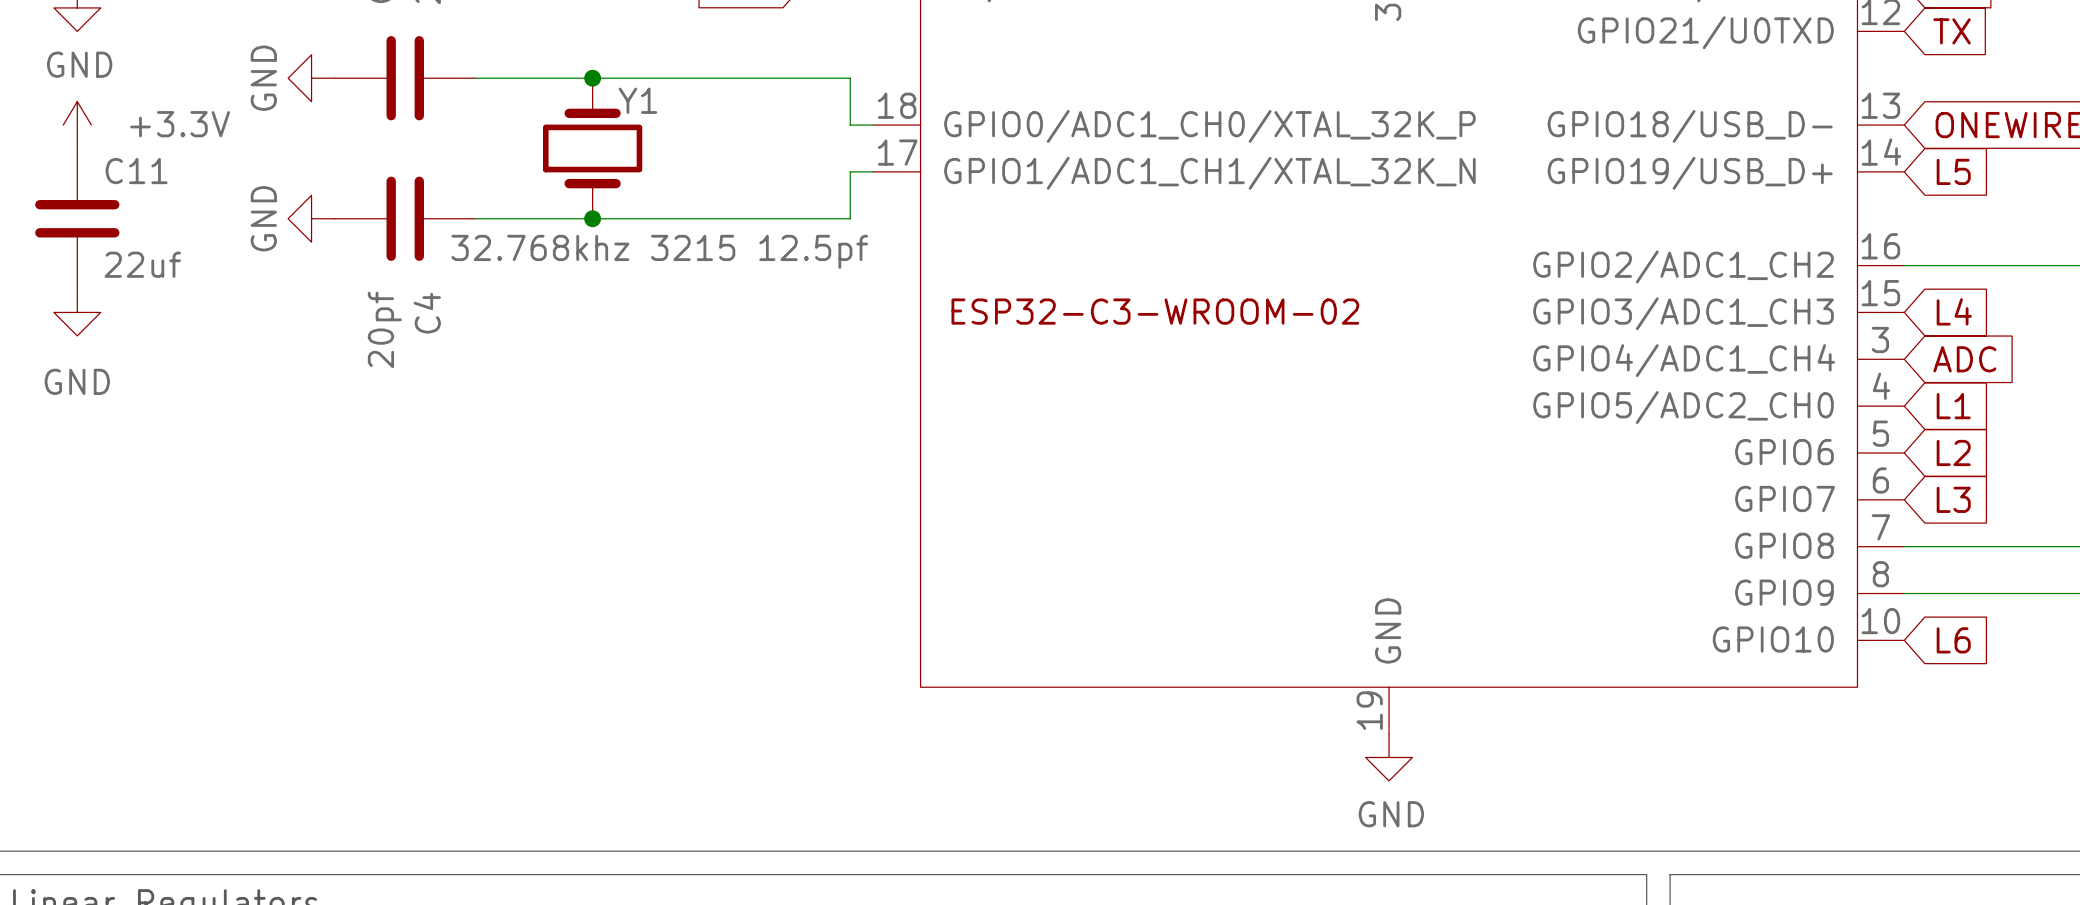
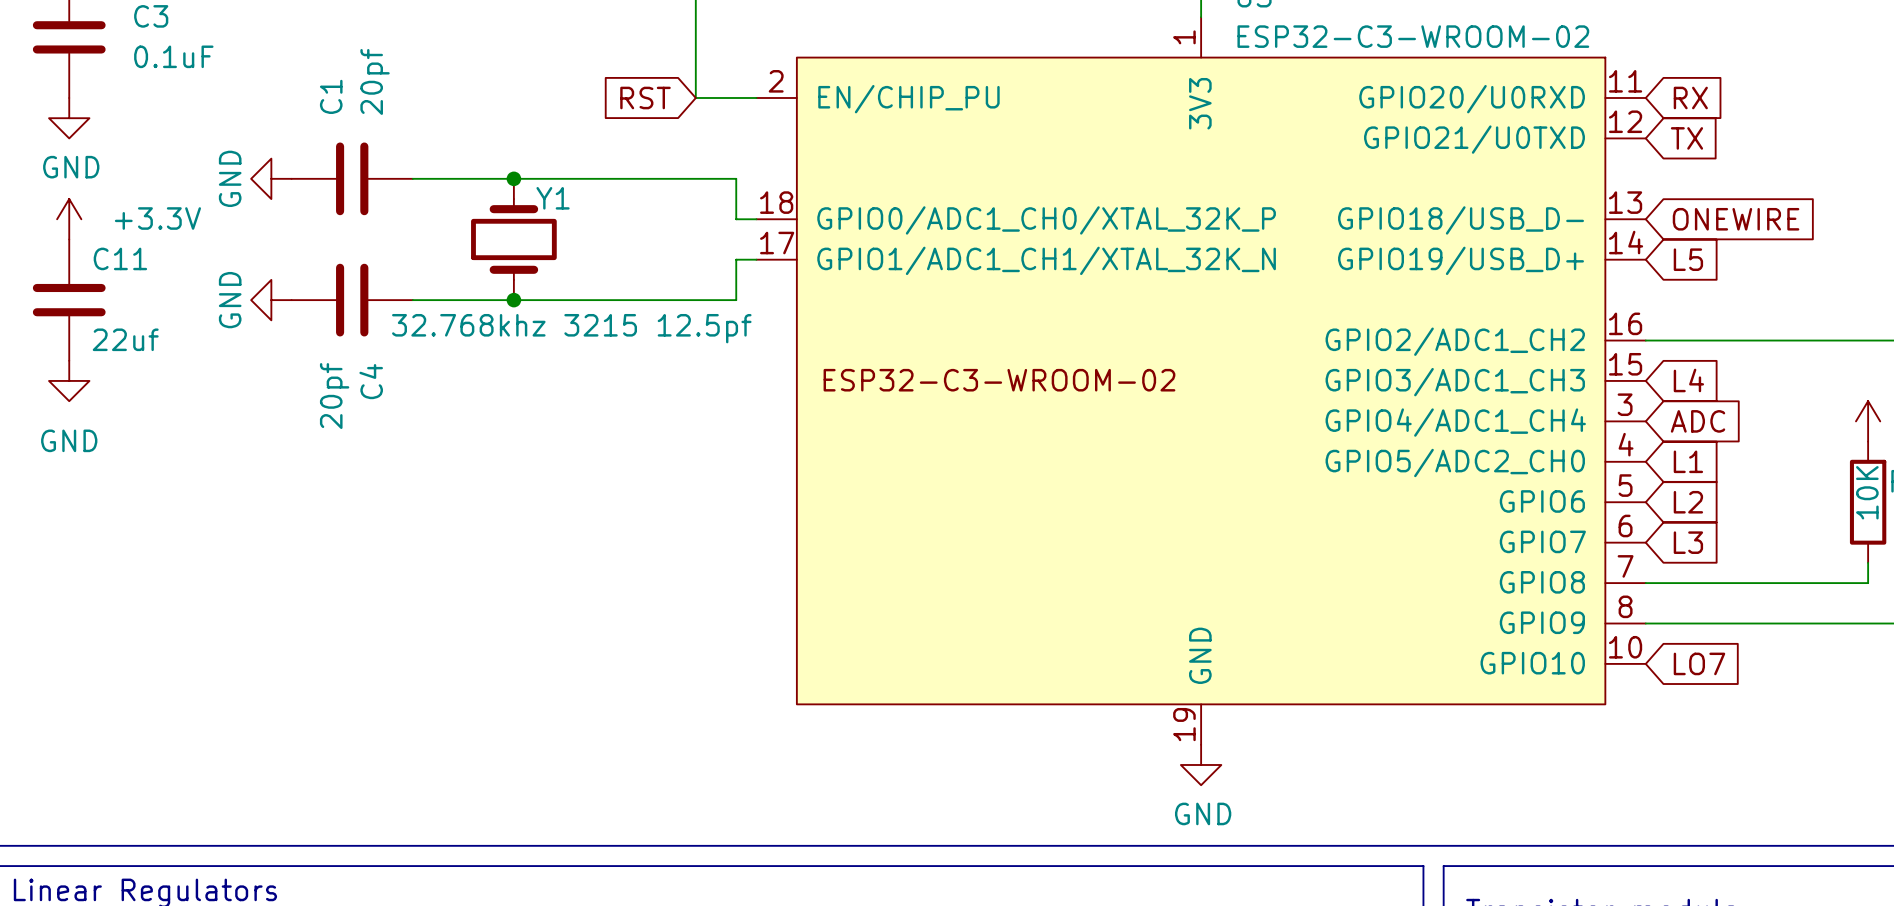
global label: L6 (1953, 640) -> LO7 (1699, 663)

